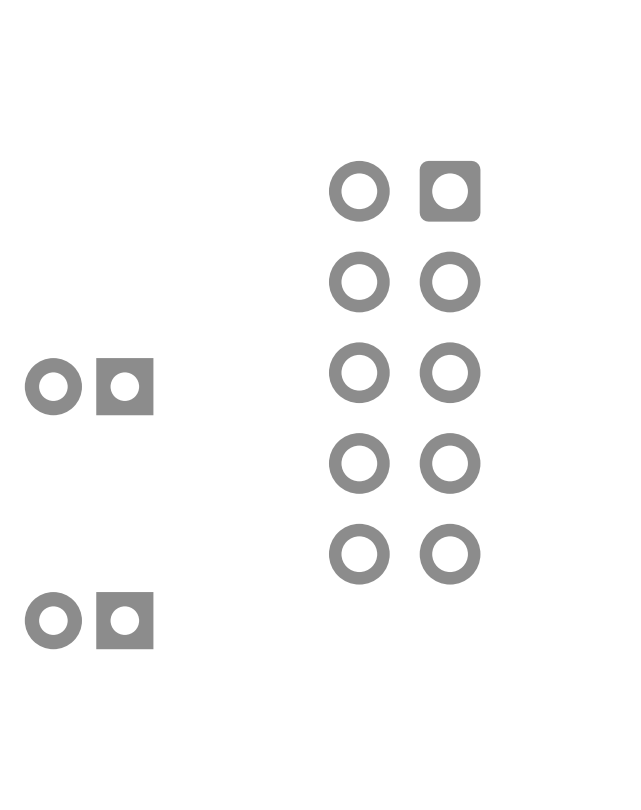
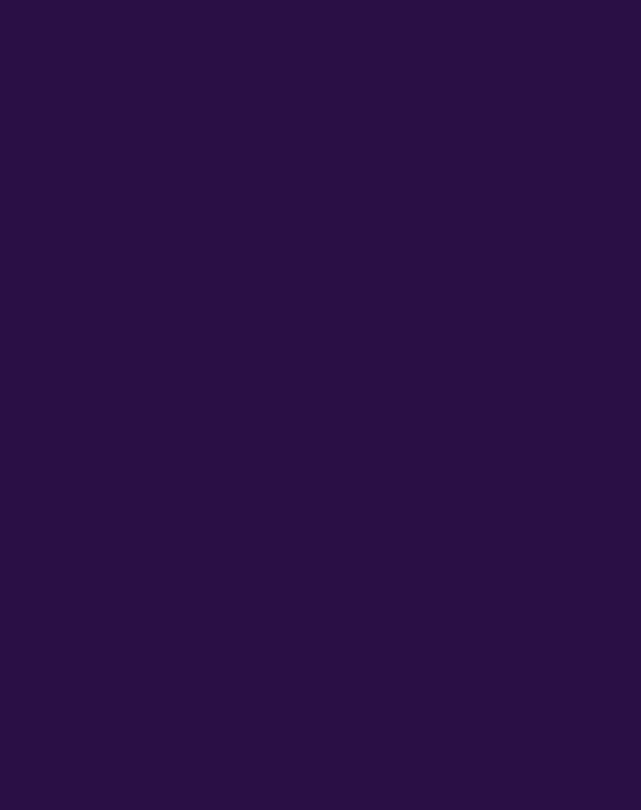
part: (404, 372) -> none
part: (89, 386) -> none
part: (89, 620) -> none

